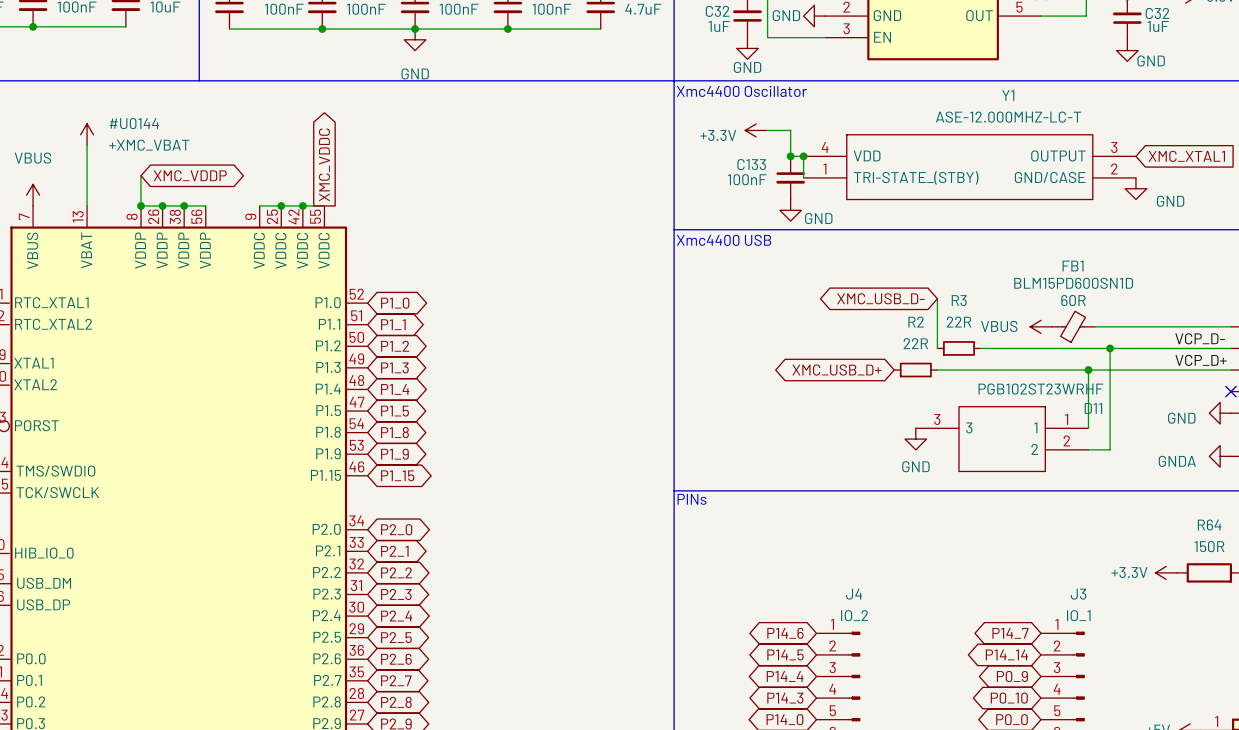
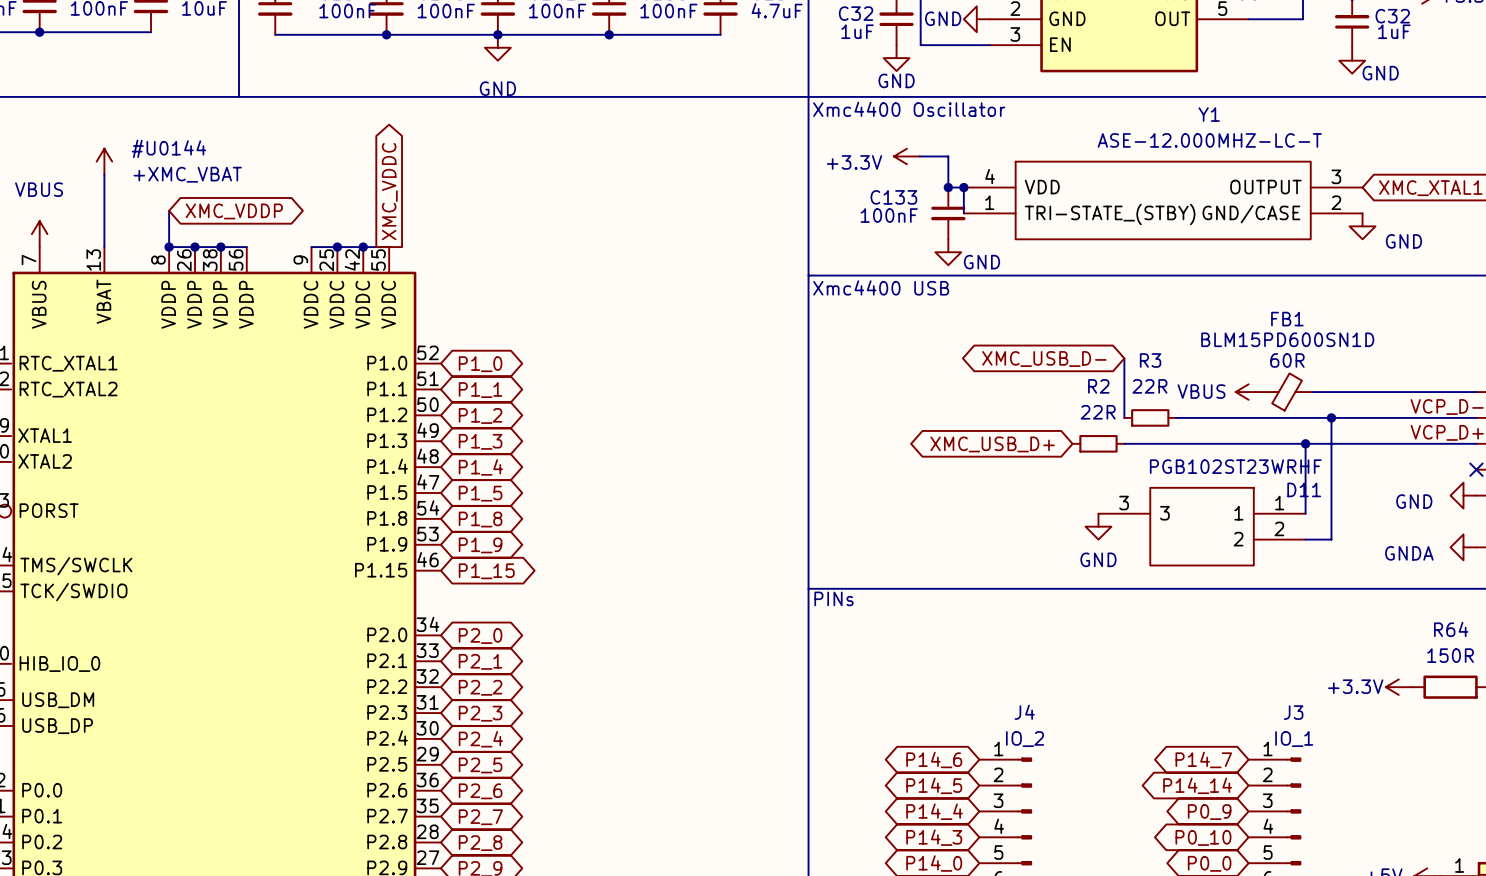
part pin name: TMS/SWDIO (55, 471) -> TMS/SWCLK (76, 566)
part pin name: TCK/SWCLK (57, 492) -> TCK/SWDIO (73, 592)

